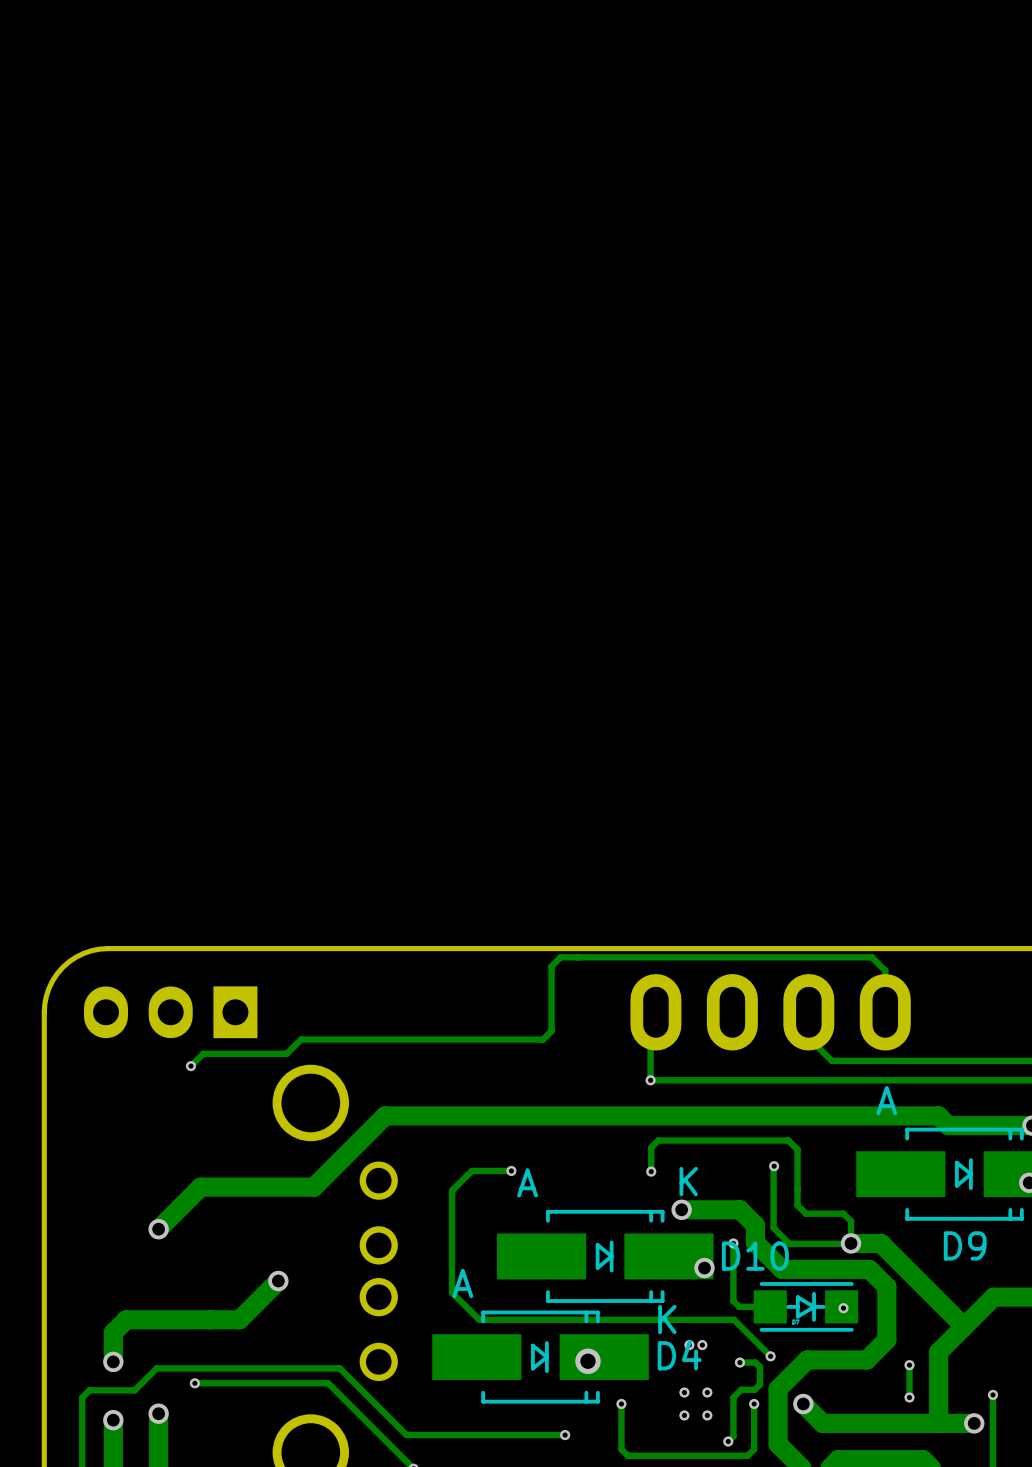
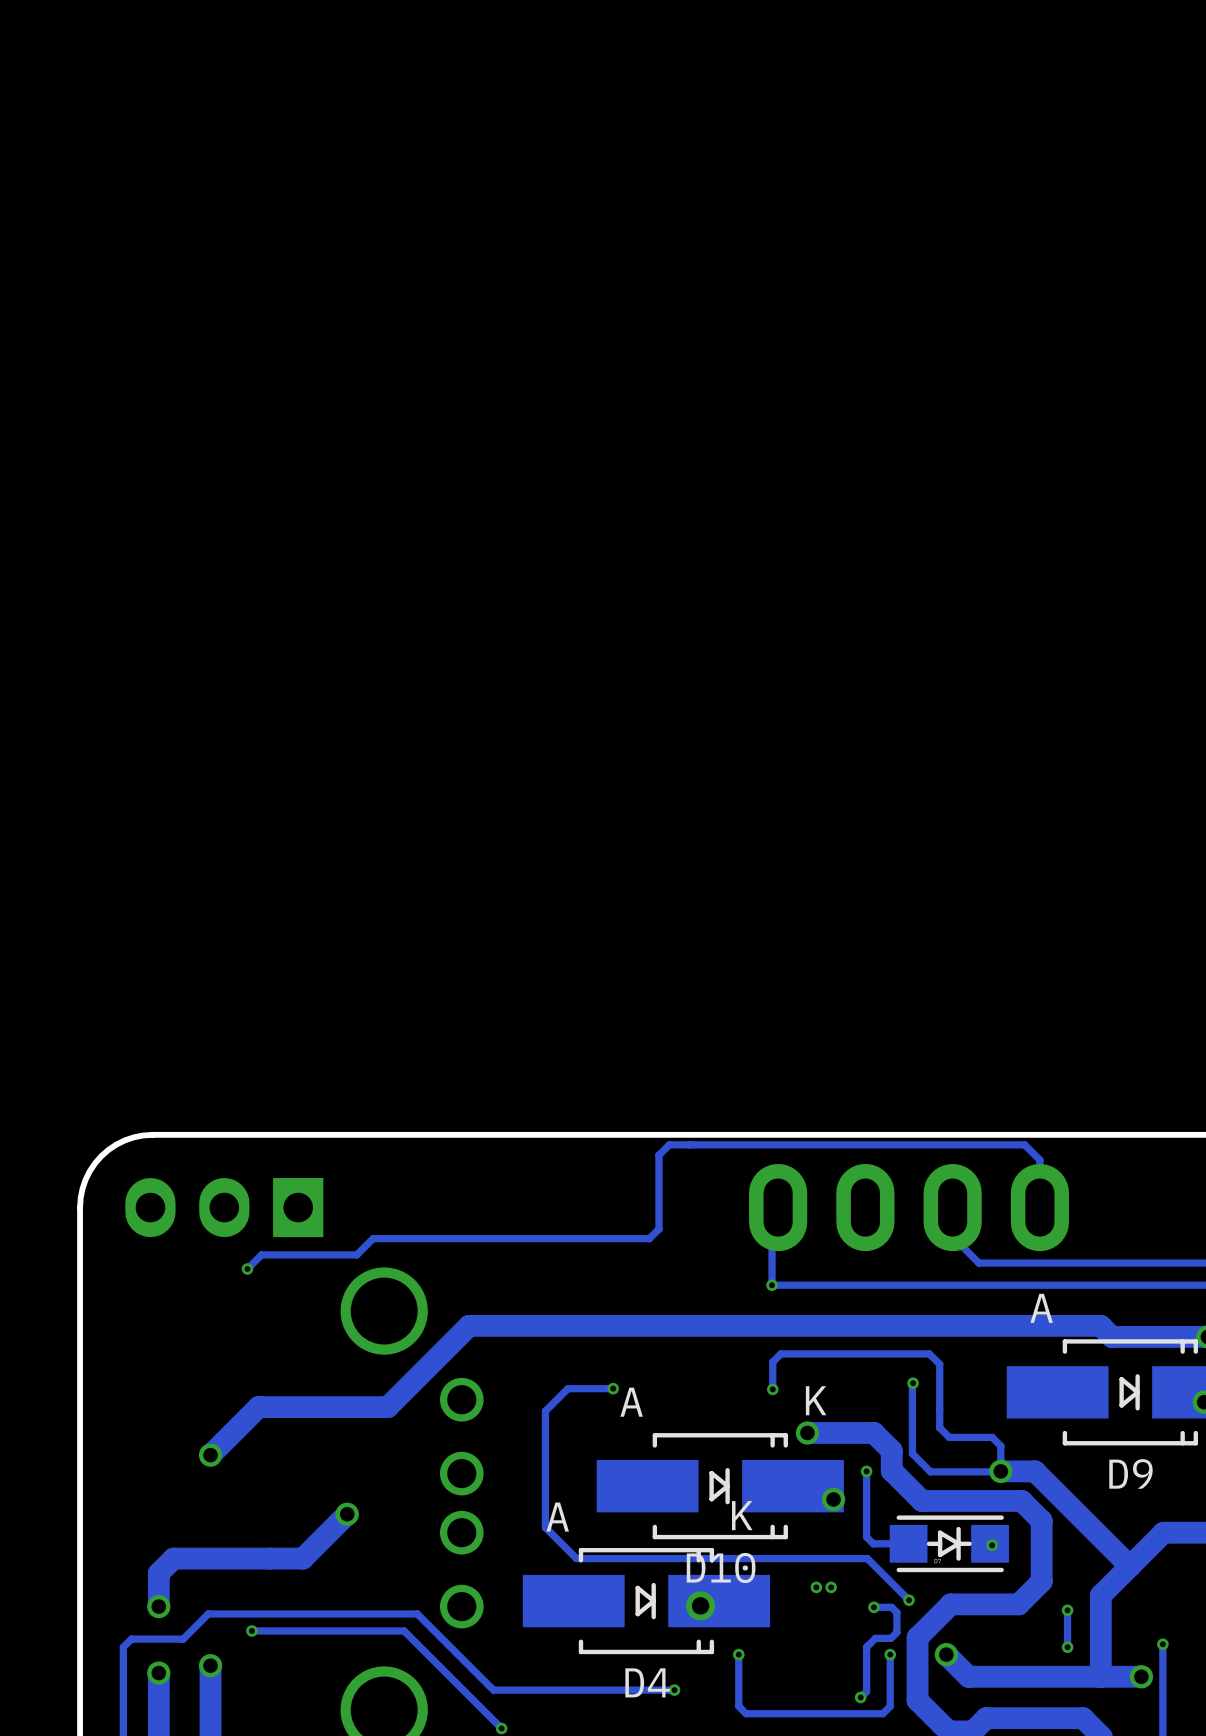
D10 name position: D10 (755, 1256) -> D10 (721, 1567)
D4 text position: K (667, 1319) -> K (742, 1515)
D4 name position: D4 (679, 1355) -> D4 (647, 1682)
via: (684, 1392) -> none
via: (707, 1392) -> none
via: (684, 1415) -> none
via: (707, 1415) -> none

